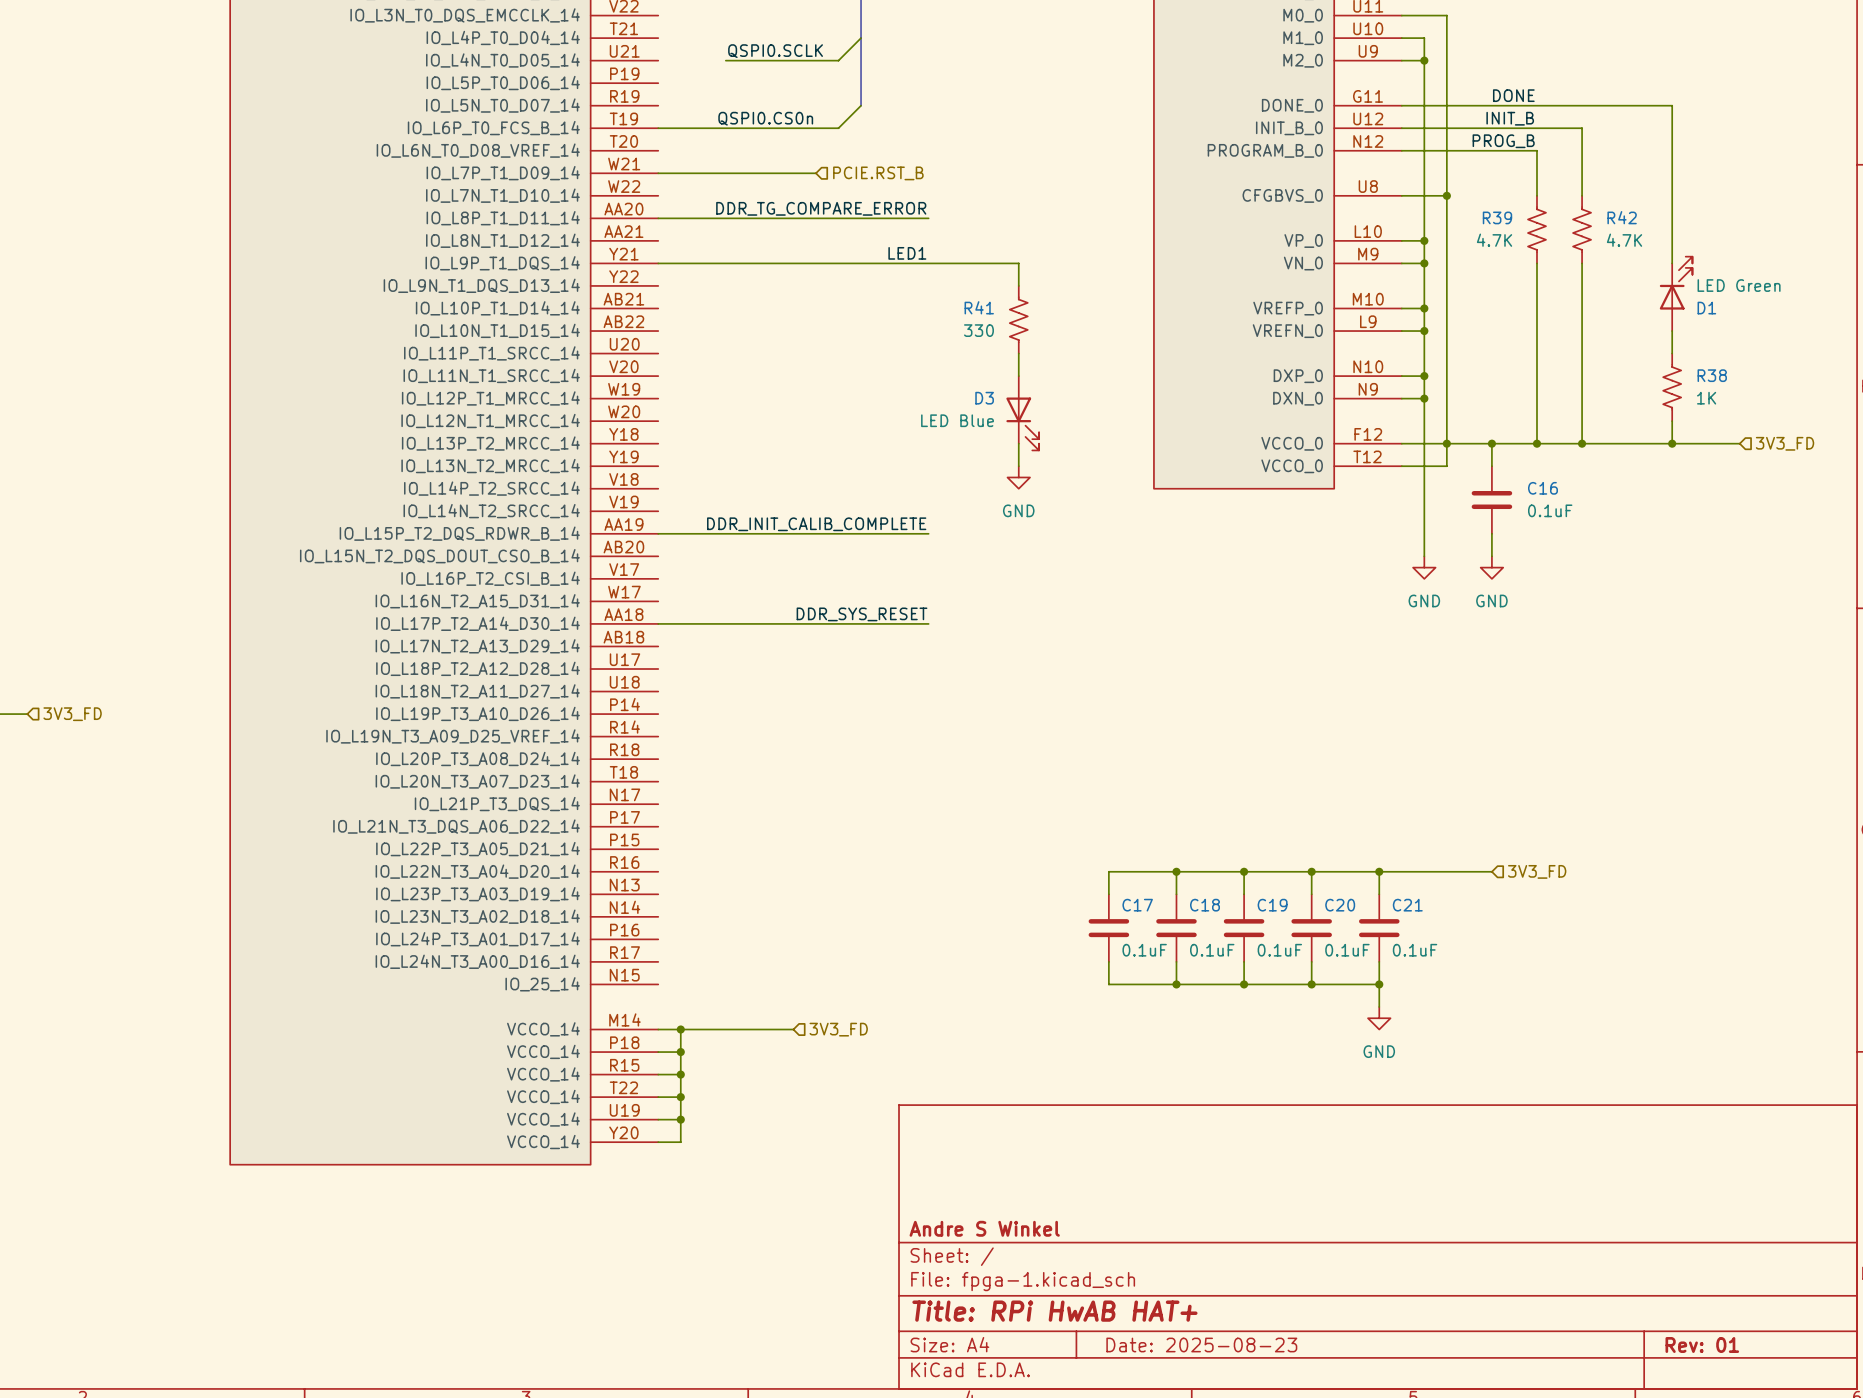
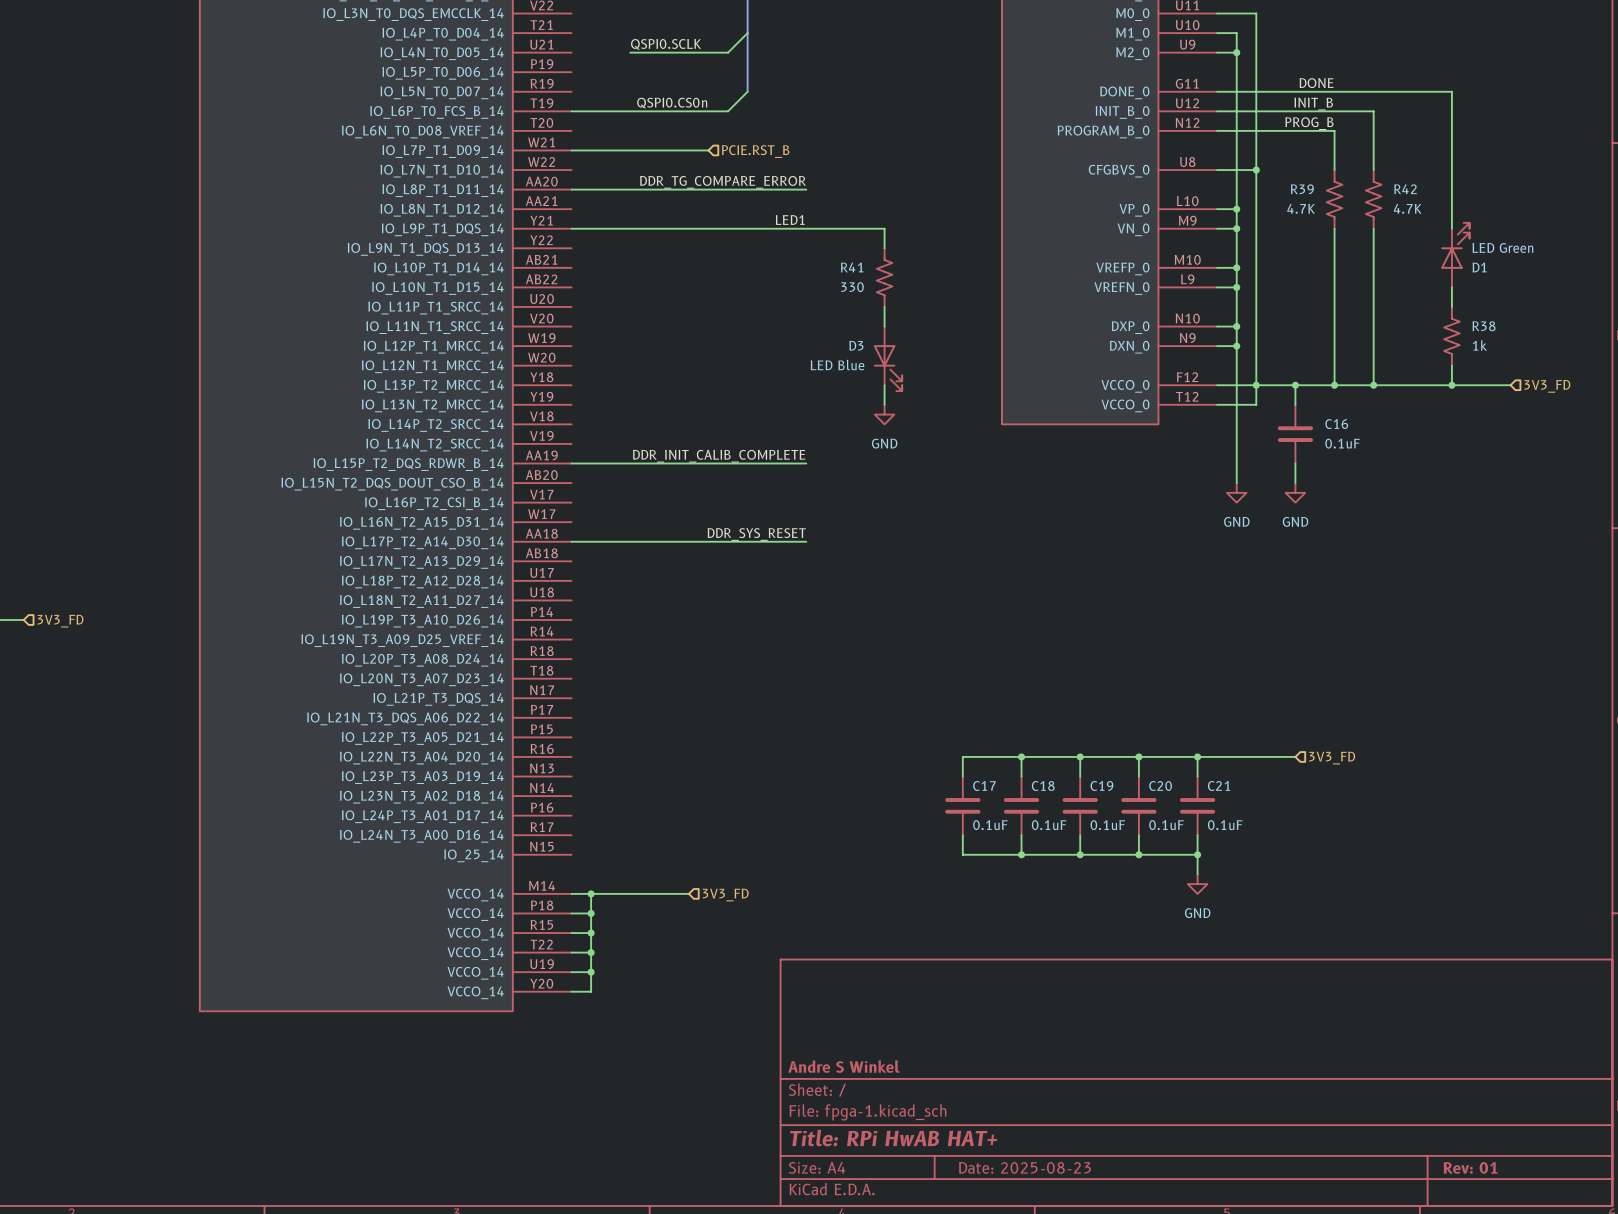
R38 value: 1K (1706, 398) -> 1k (1479, 345)

